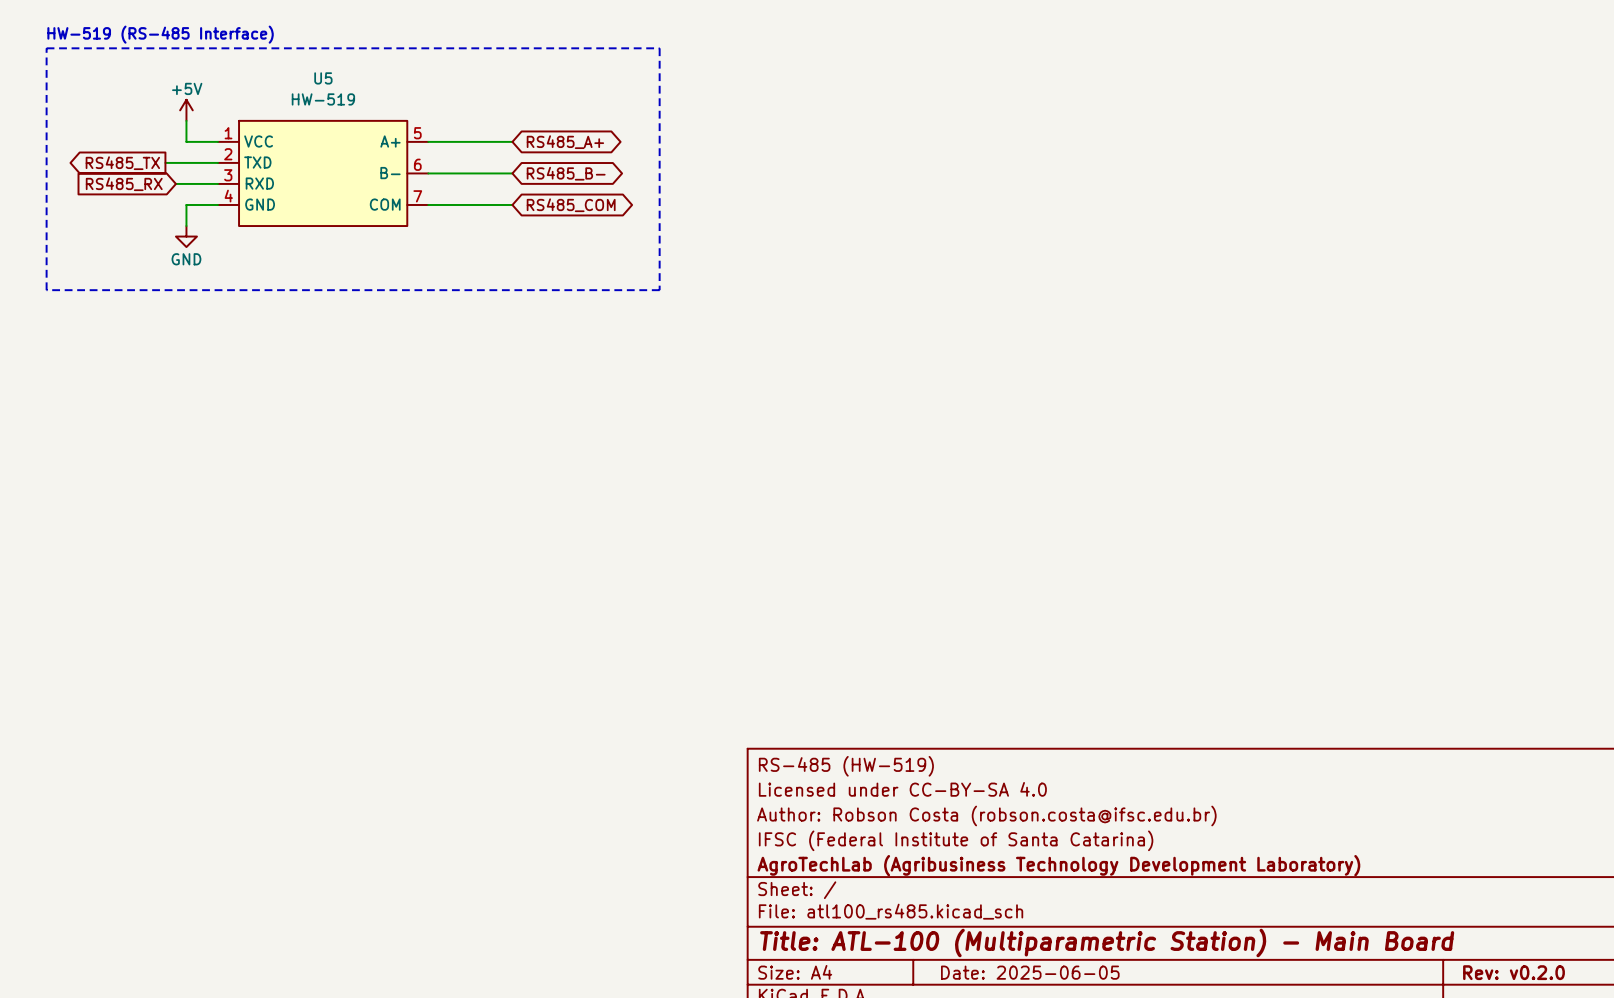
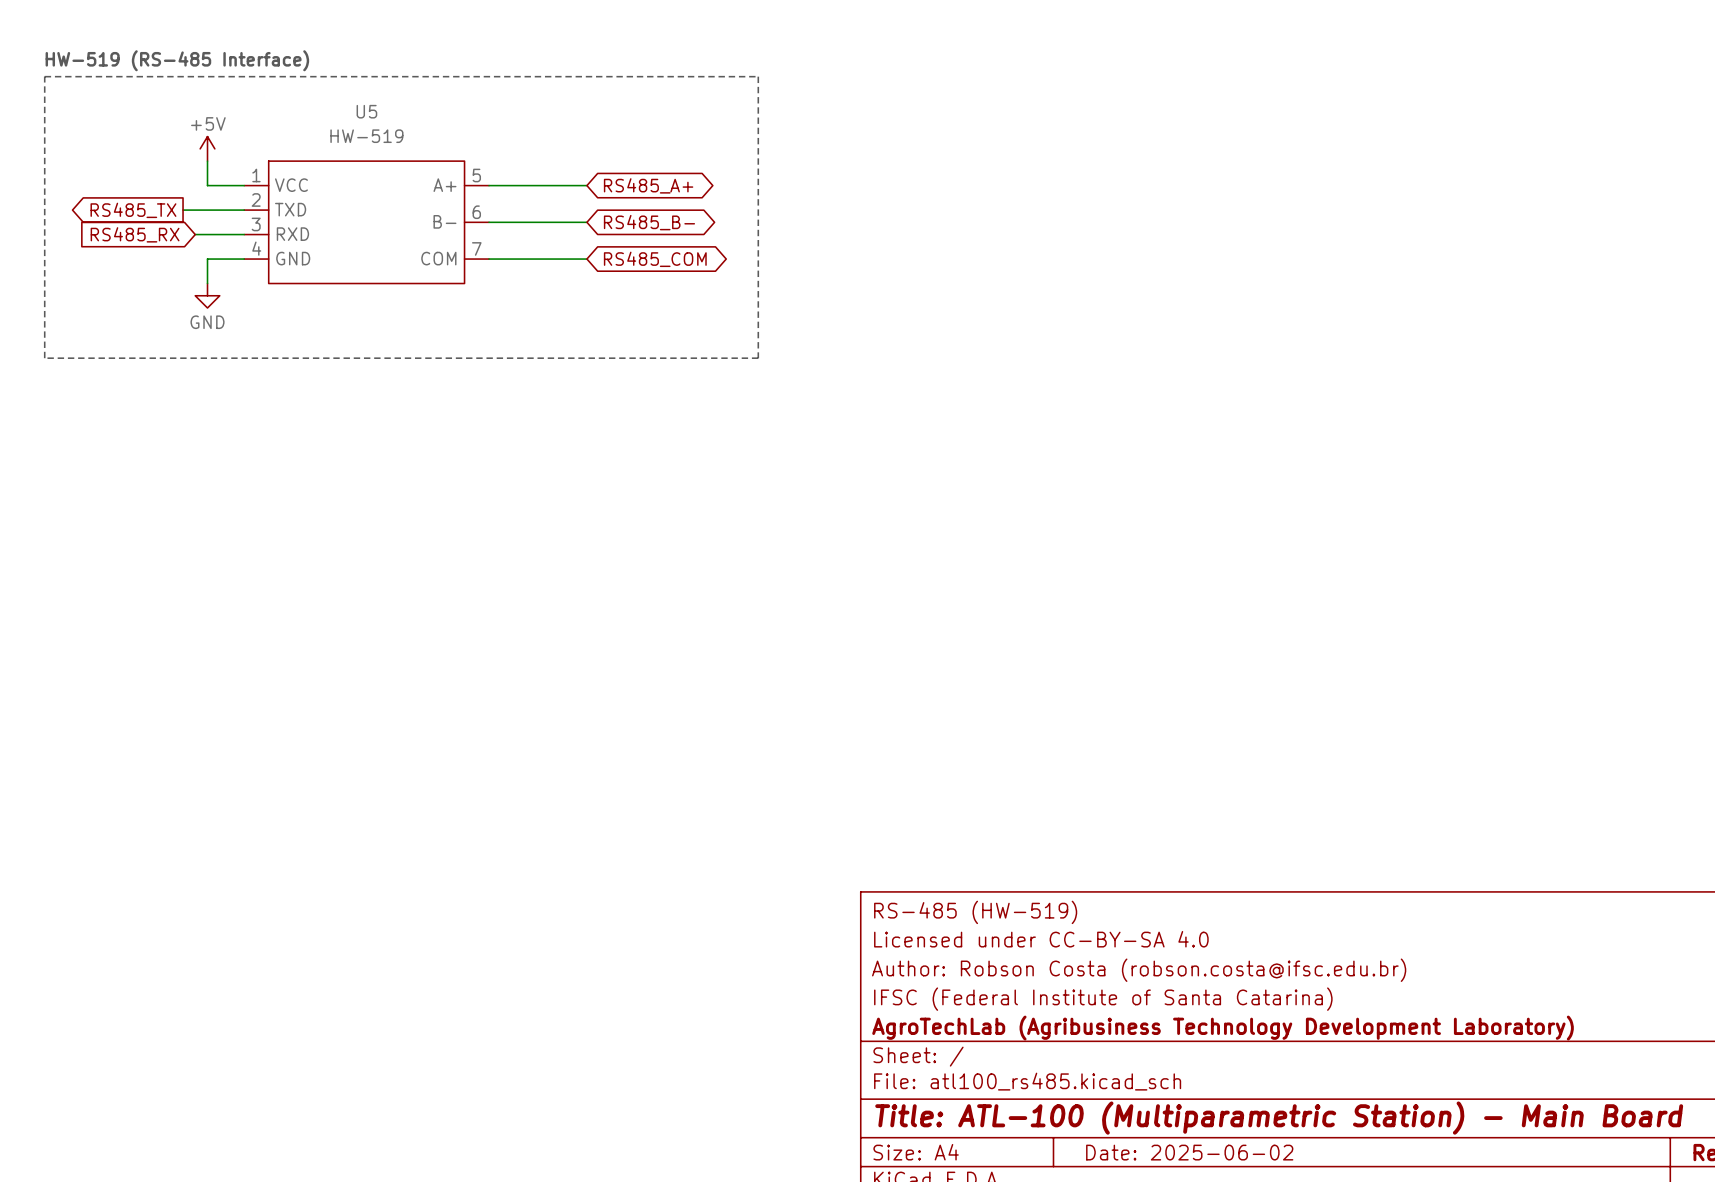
title block: Date: 2025-06-05 (1030, 972) -> Date: 2025-06-02 (1189, 1152)

